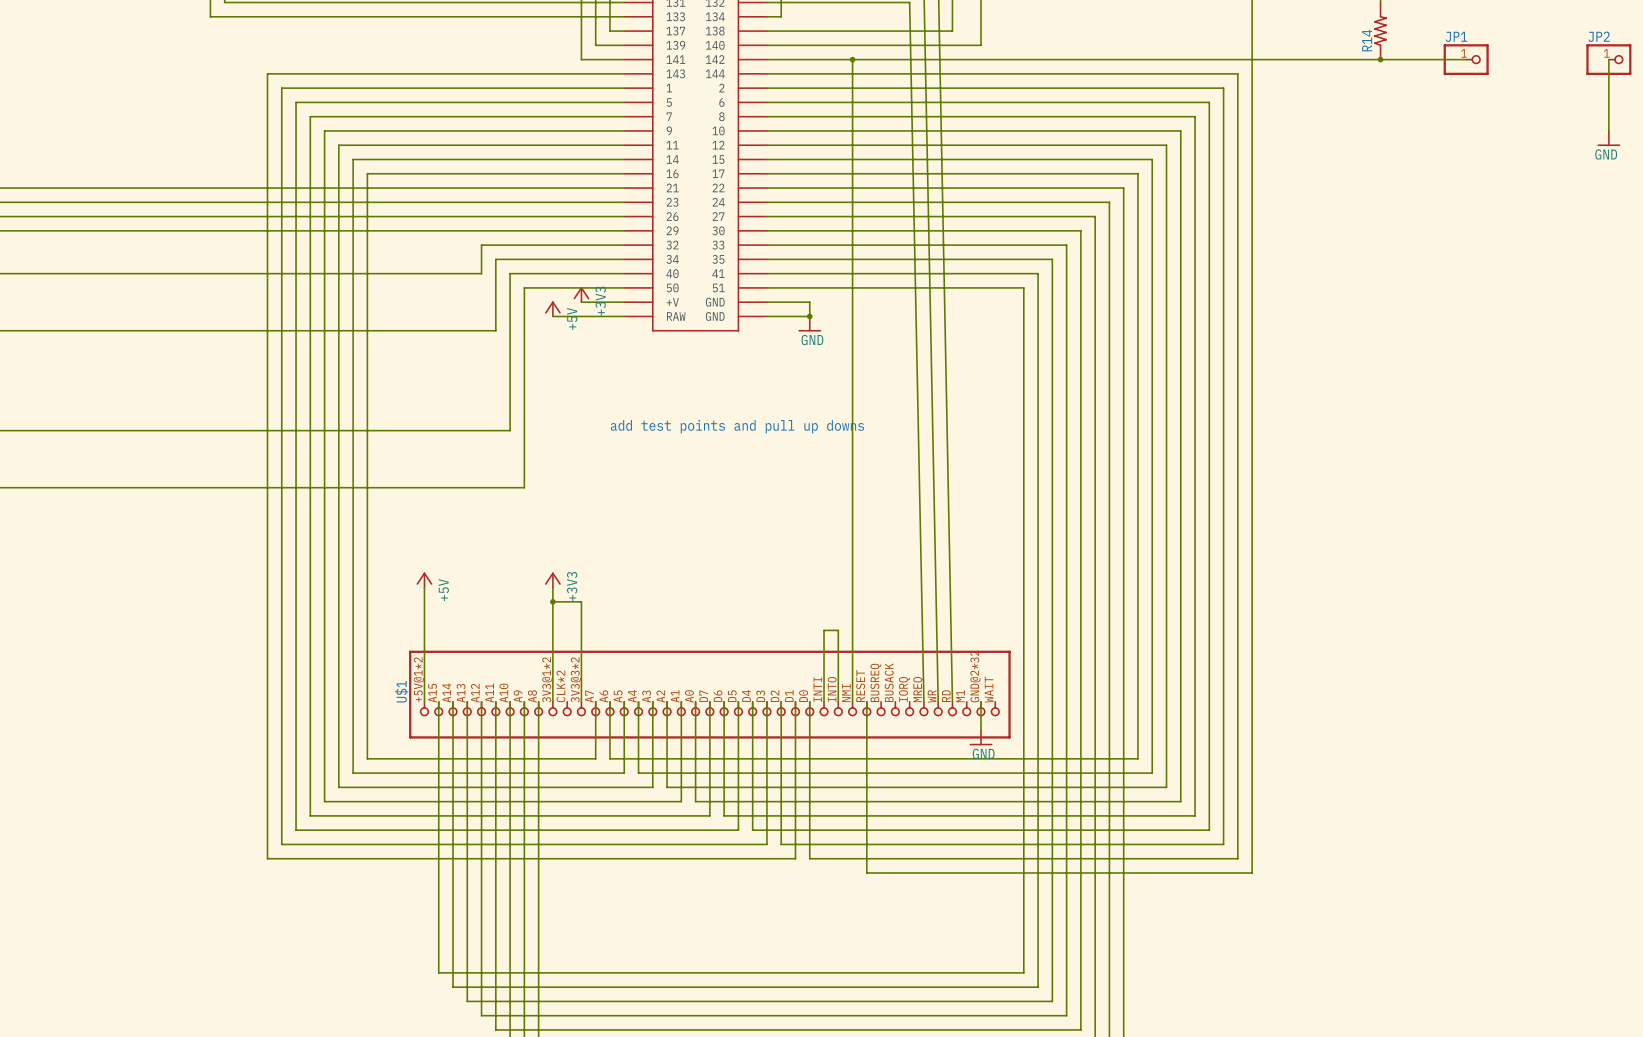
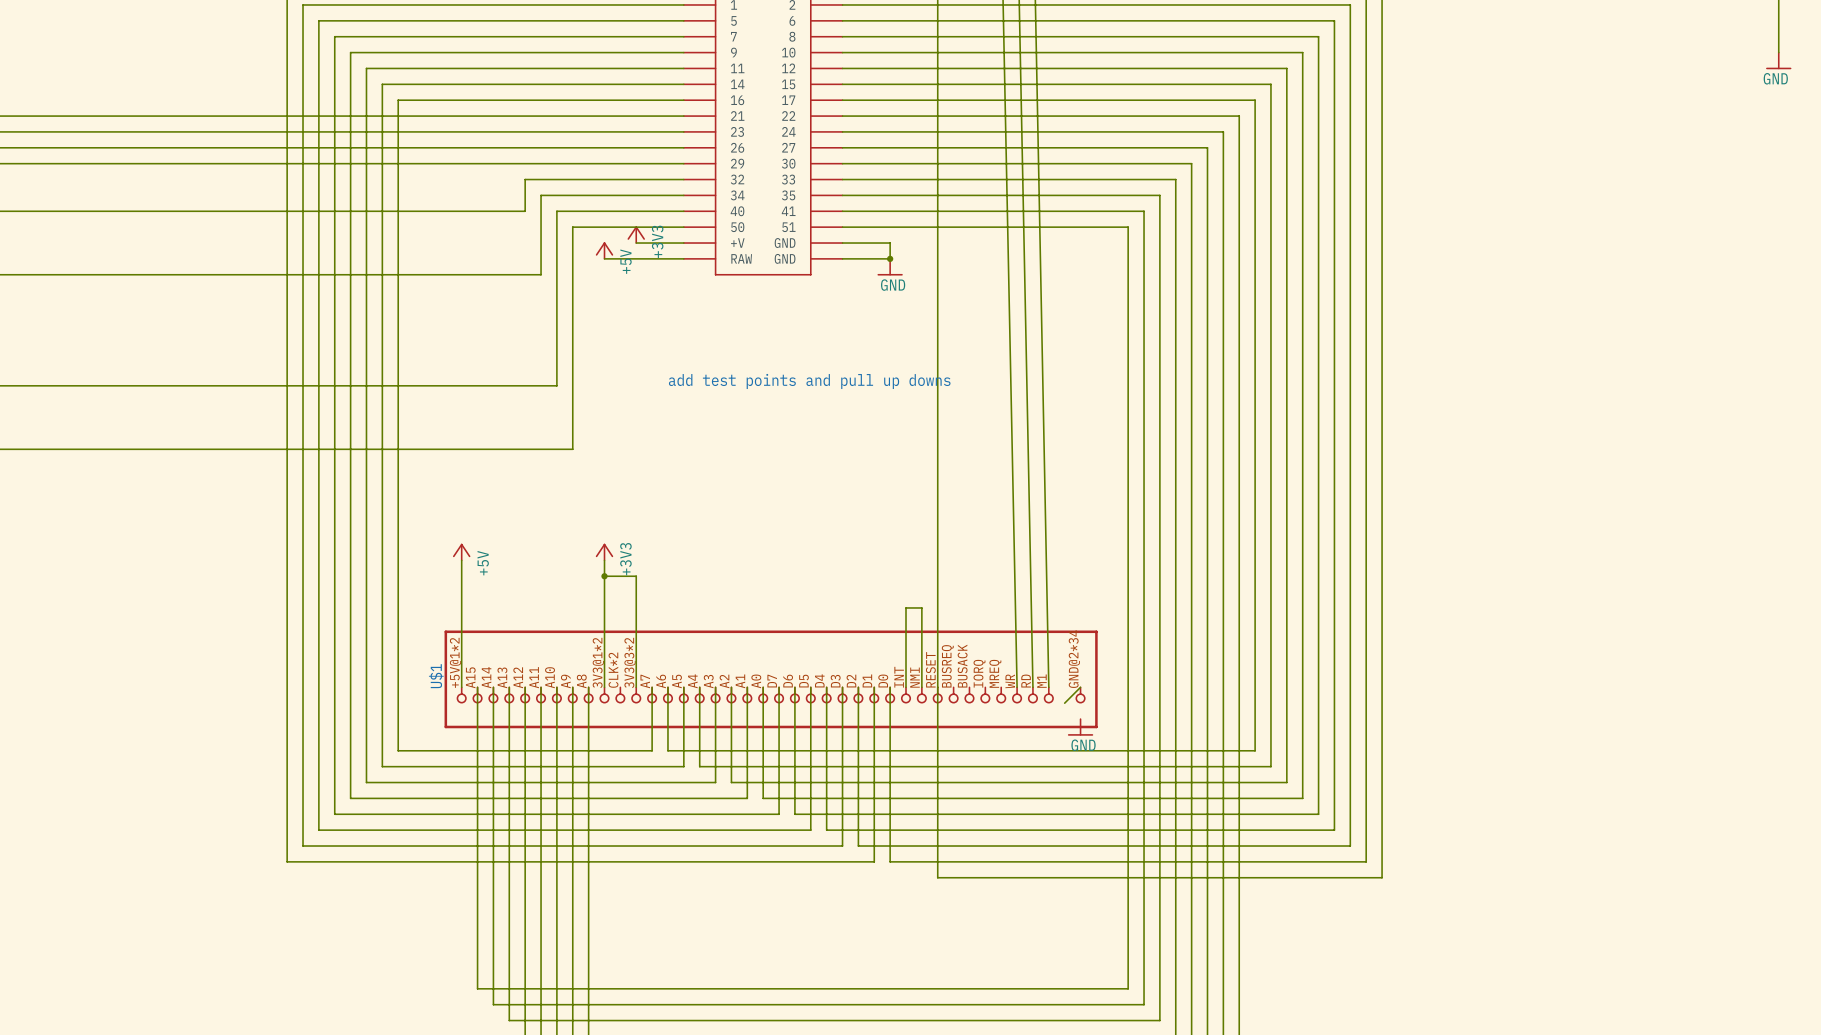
U$1 symbol: [409, 650, 1011, 739] -> [444, 630, 1098, 729]
wire: (866, 701) (866, 872) -> (937, 687) (937, 877) (953, 877)
wire: (980, 701) (980, 730) -> (1080, 687) (1064, 703)

